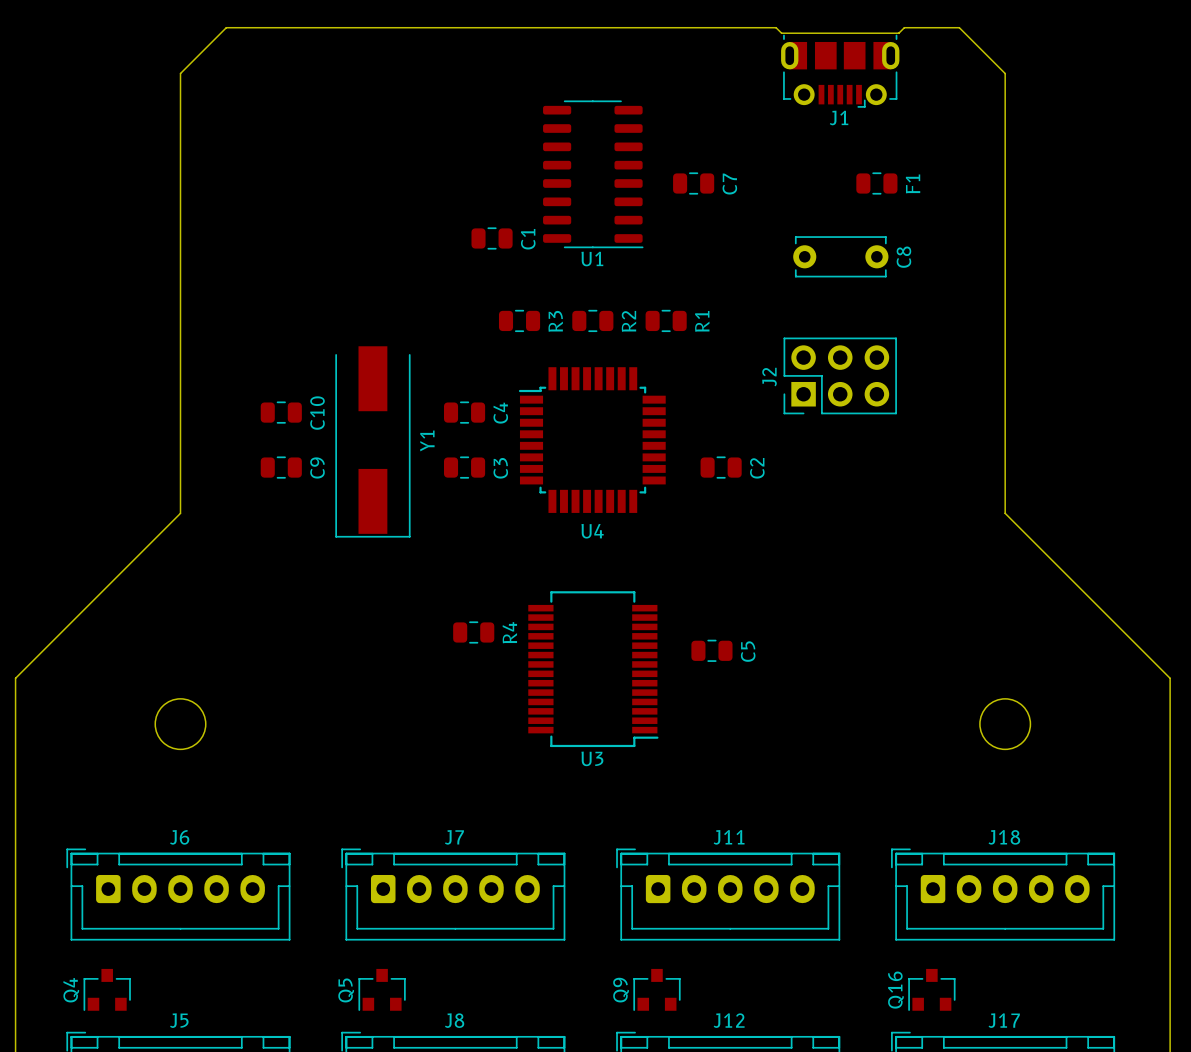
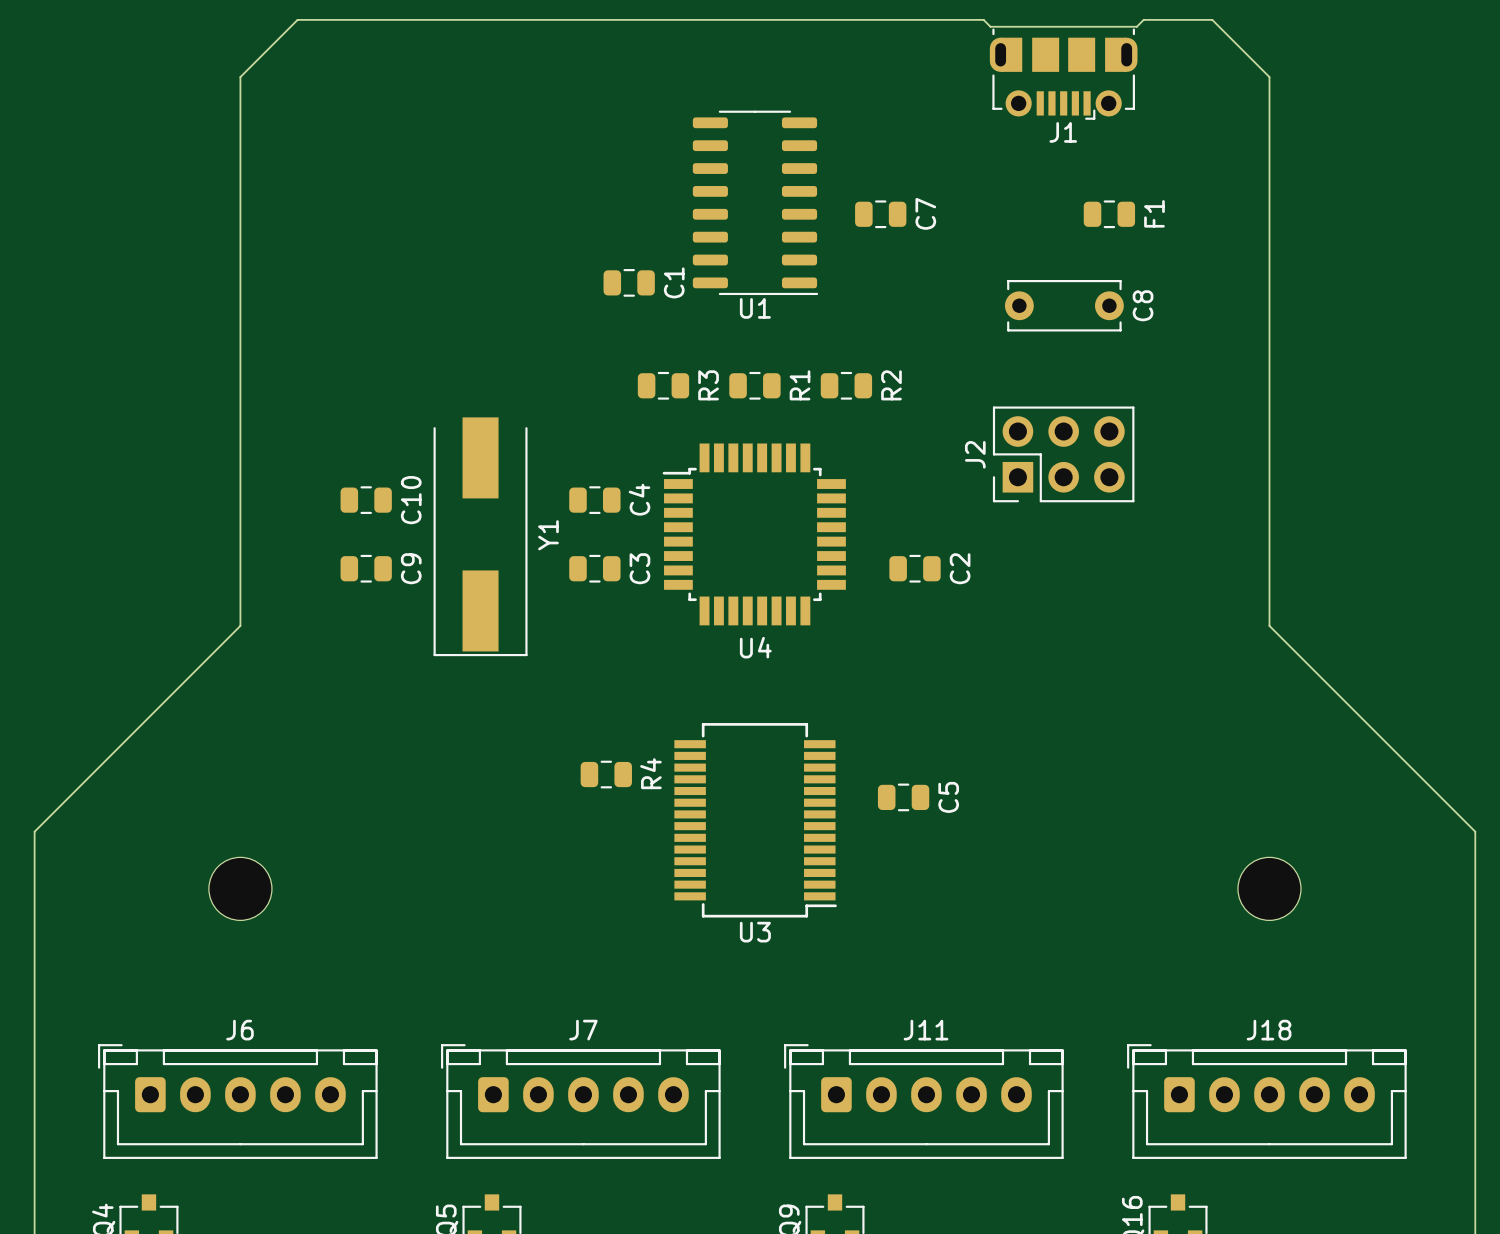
R2 name: R2 (628, 321) -> R1 (800, 385)
R1 name: R1 (702, 321) -> R2 (891, 385)

